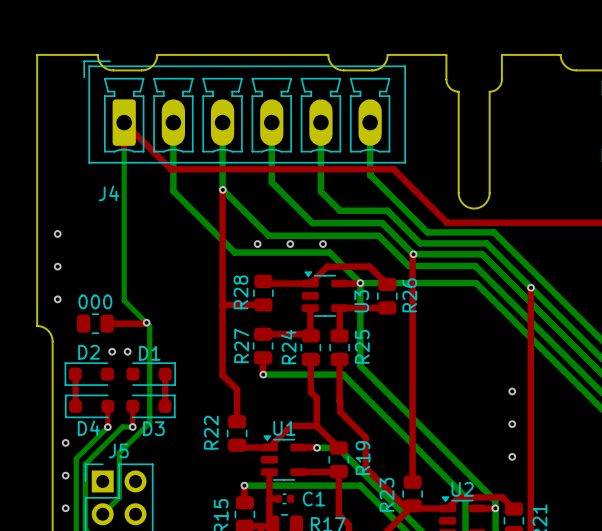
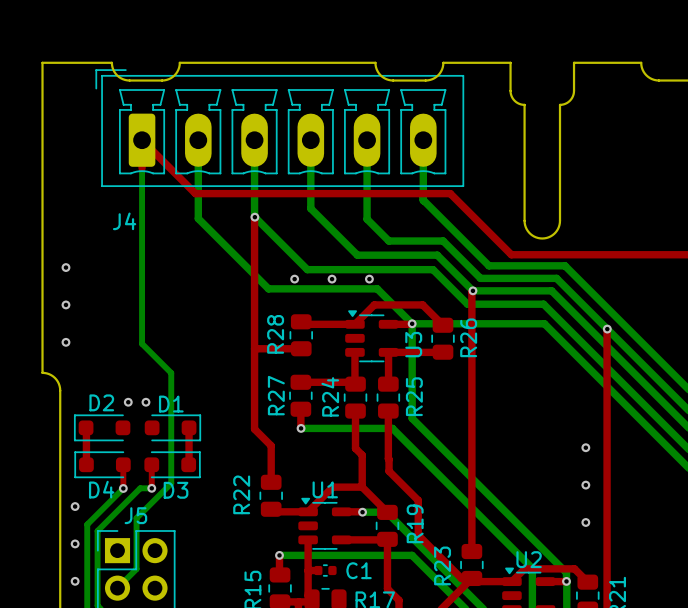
top track: (146, 322) (107, 323) -> none
via: (146, 322) -> none
000: (95, 323) -> none

